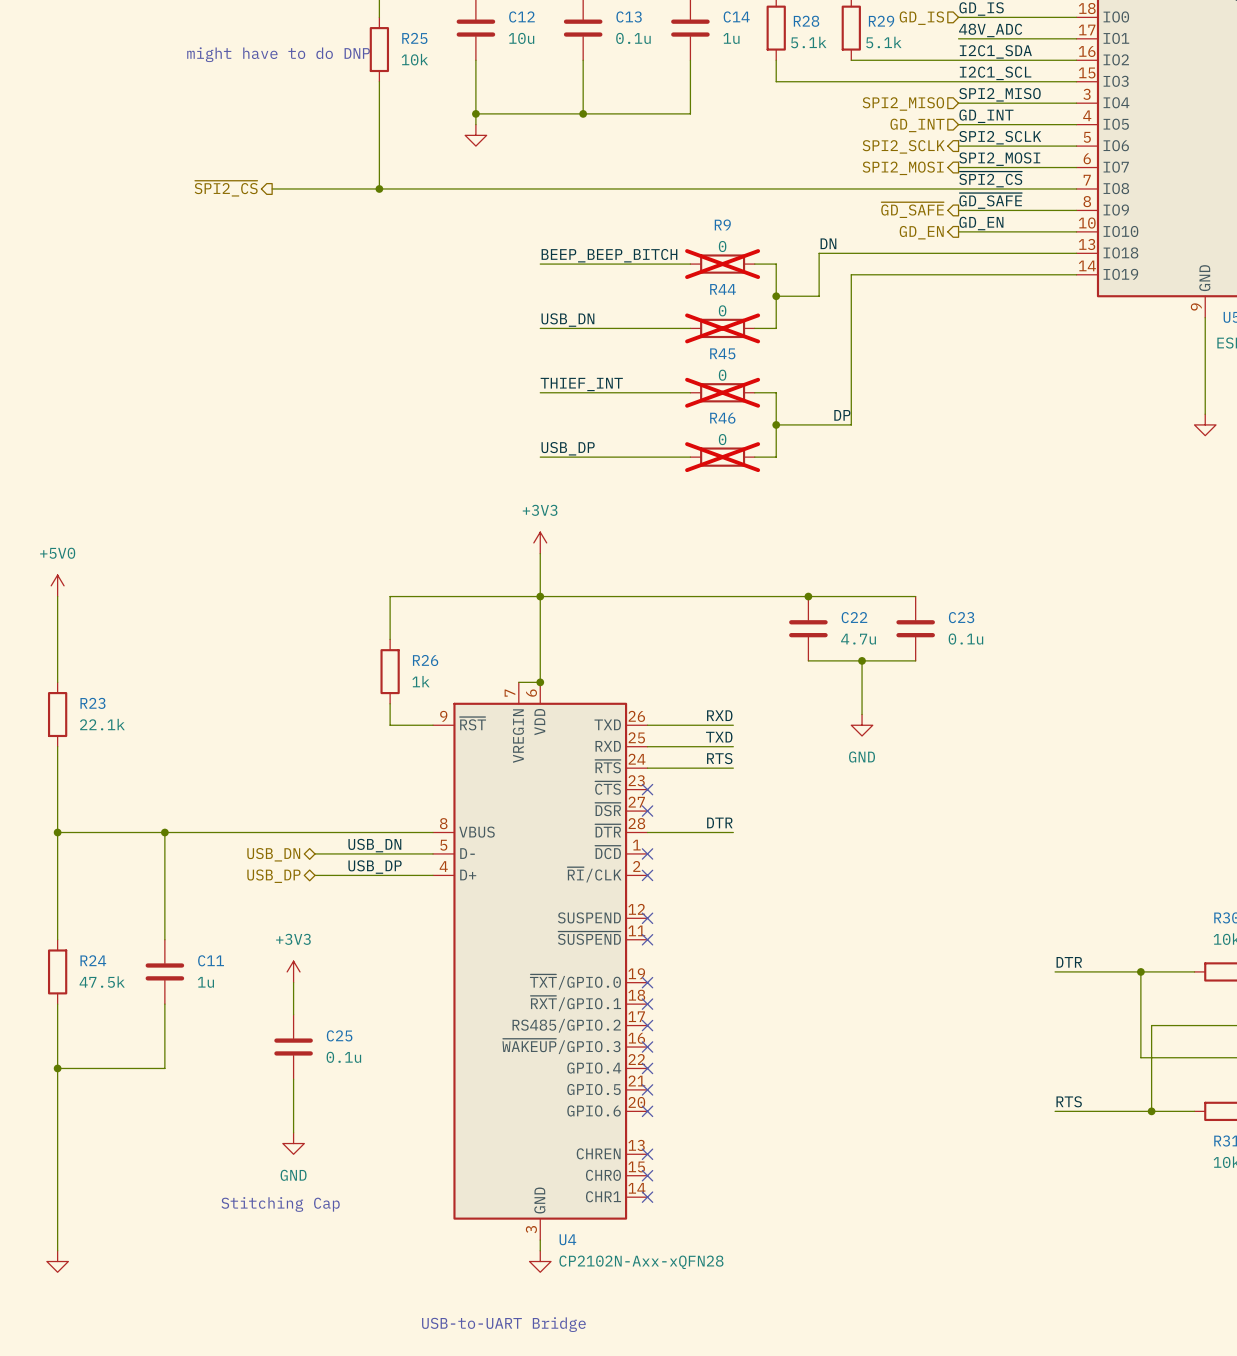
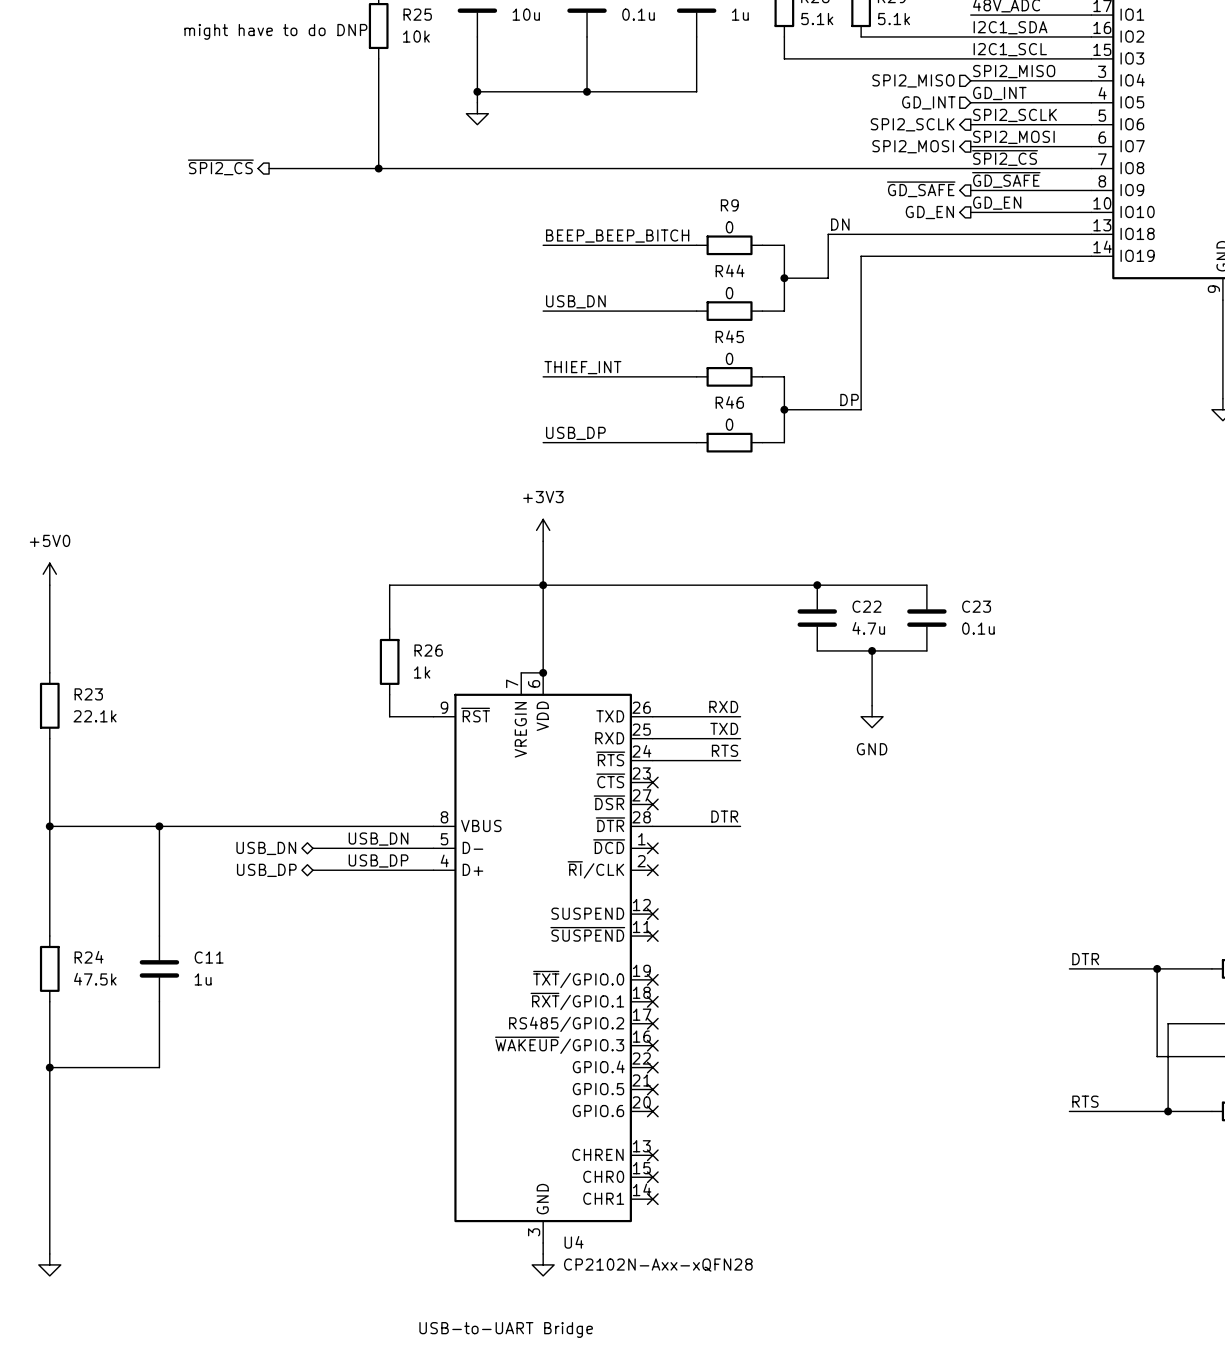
R9 do-not-place cross: (722, 264) -> none
R44 do-not-place cross: (722, 328) -> none
R45 do-not-place cross: (722, 392) -> none
R46 do-not-place cross: (722, 457) -> none
power symbol: +3V3 (293, 971) -> none
wire: (293, 982) (293, 1014) -> none
C25: 0.1u (293, 1047) -> none
wire: (293, 1079) (293, 1132) -> none
power symbol: GND (293, 1143) -> none
text: Stitching Cap (280, 1204) -> none

